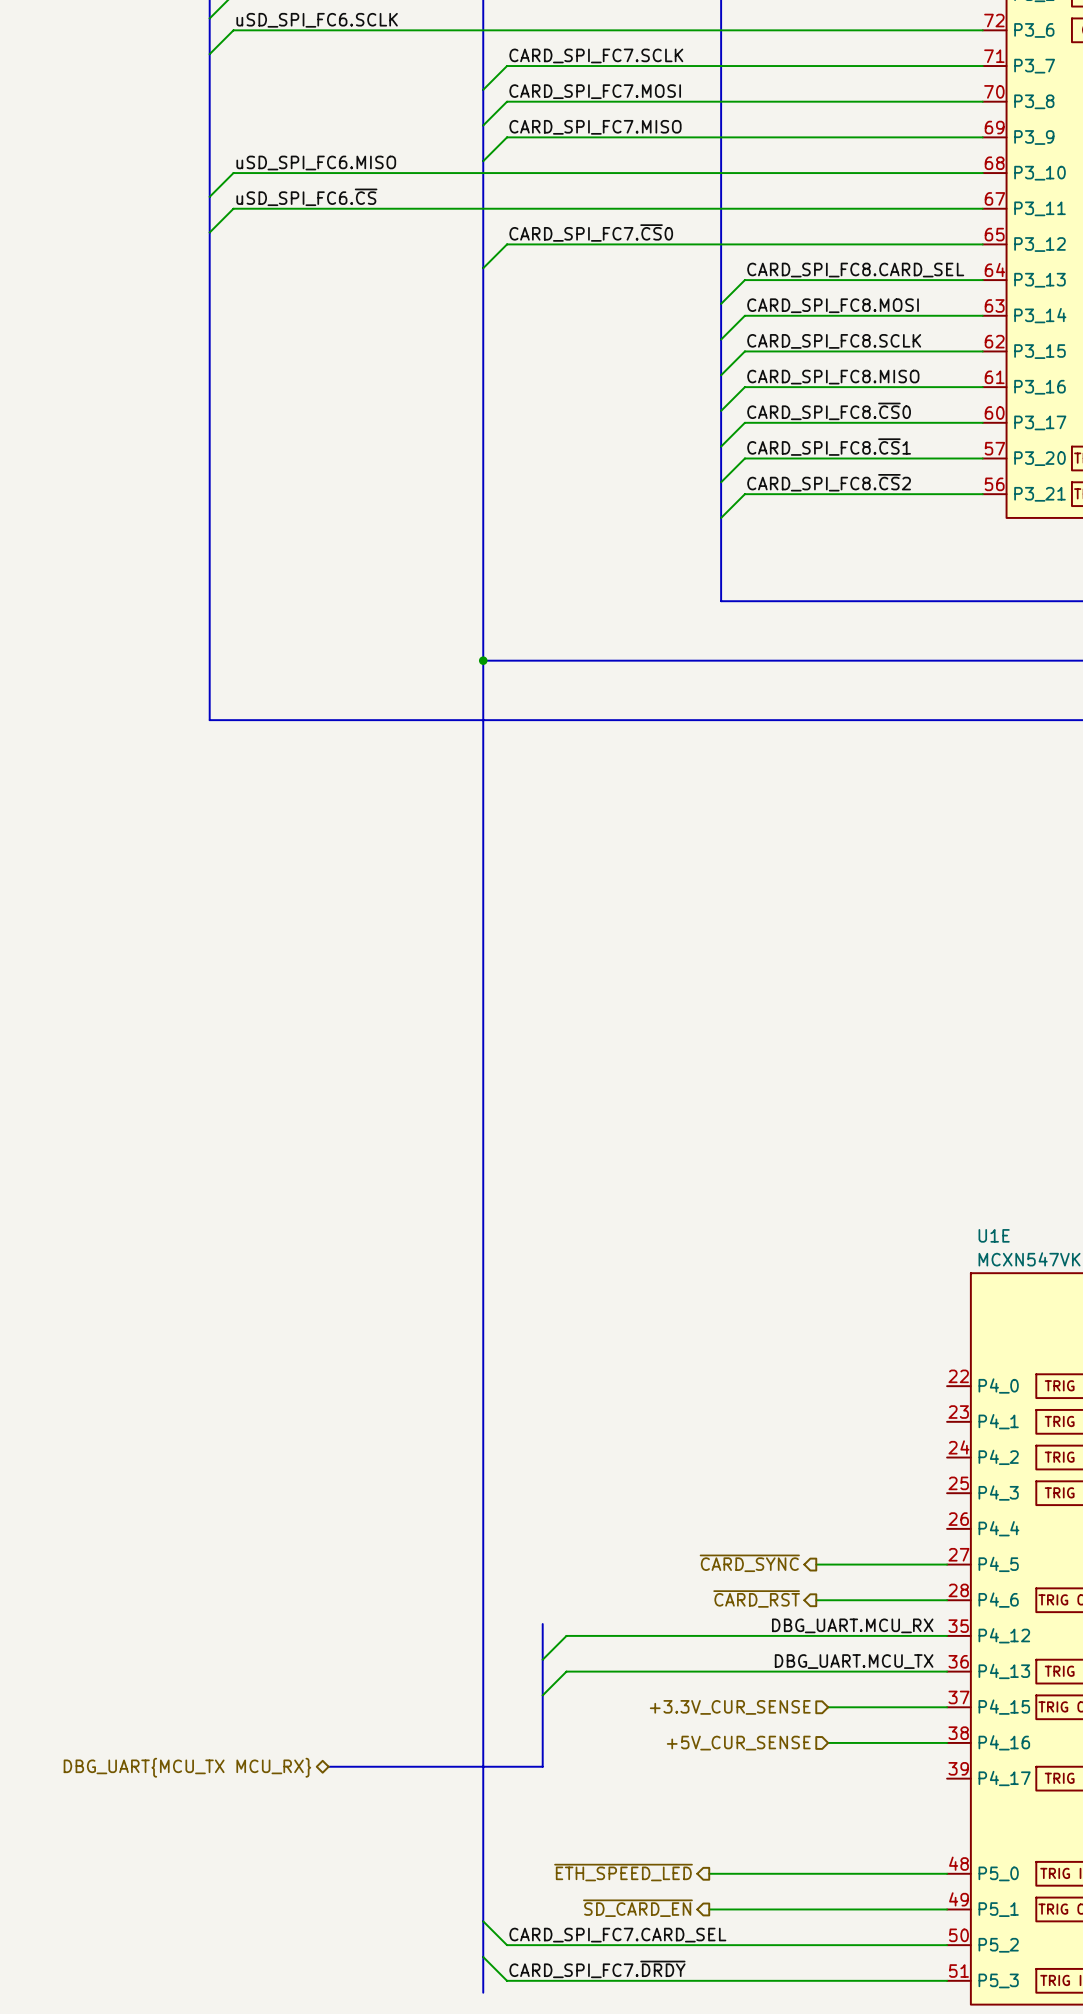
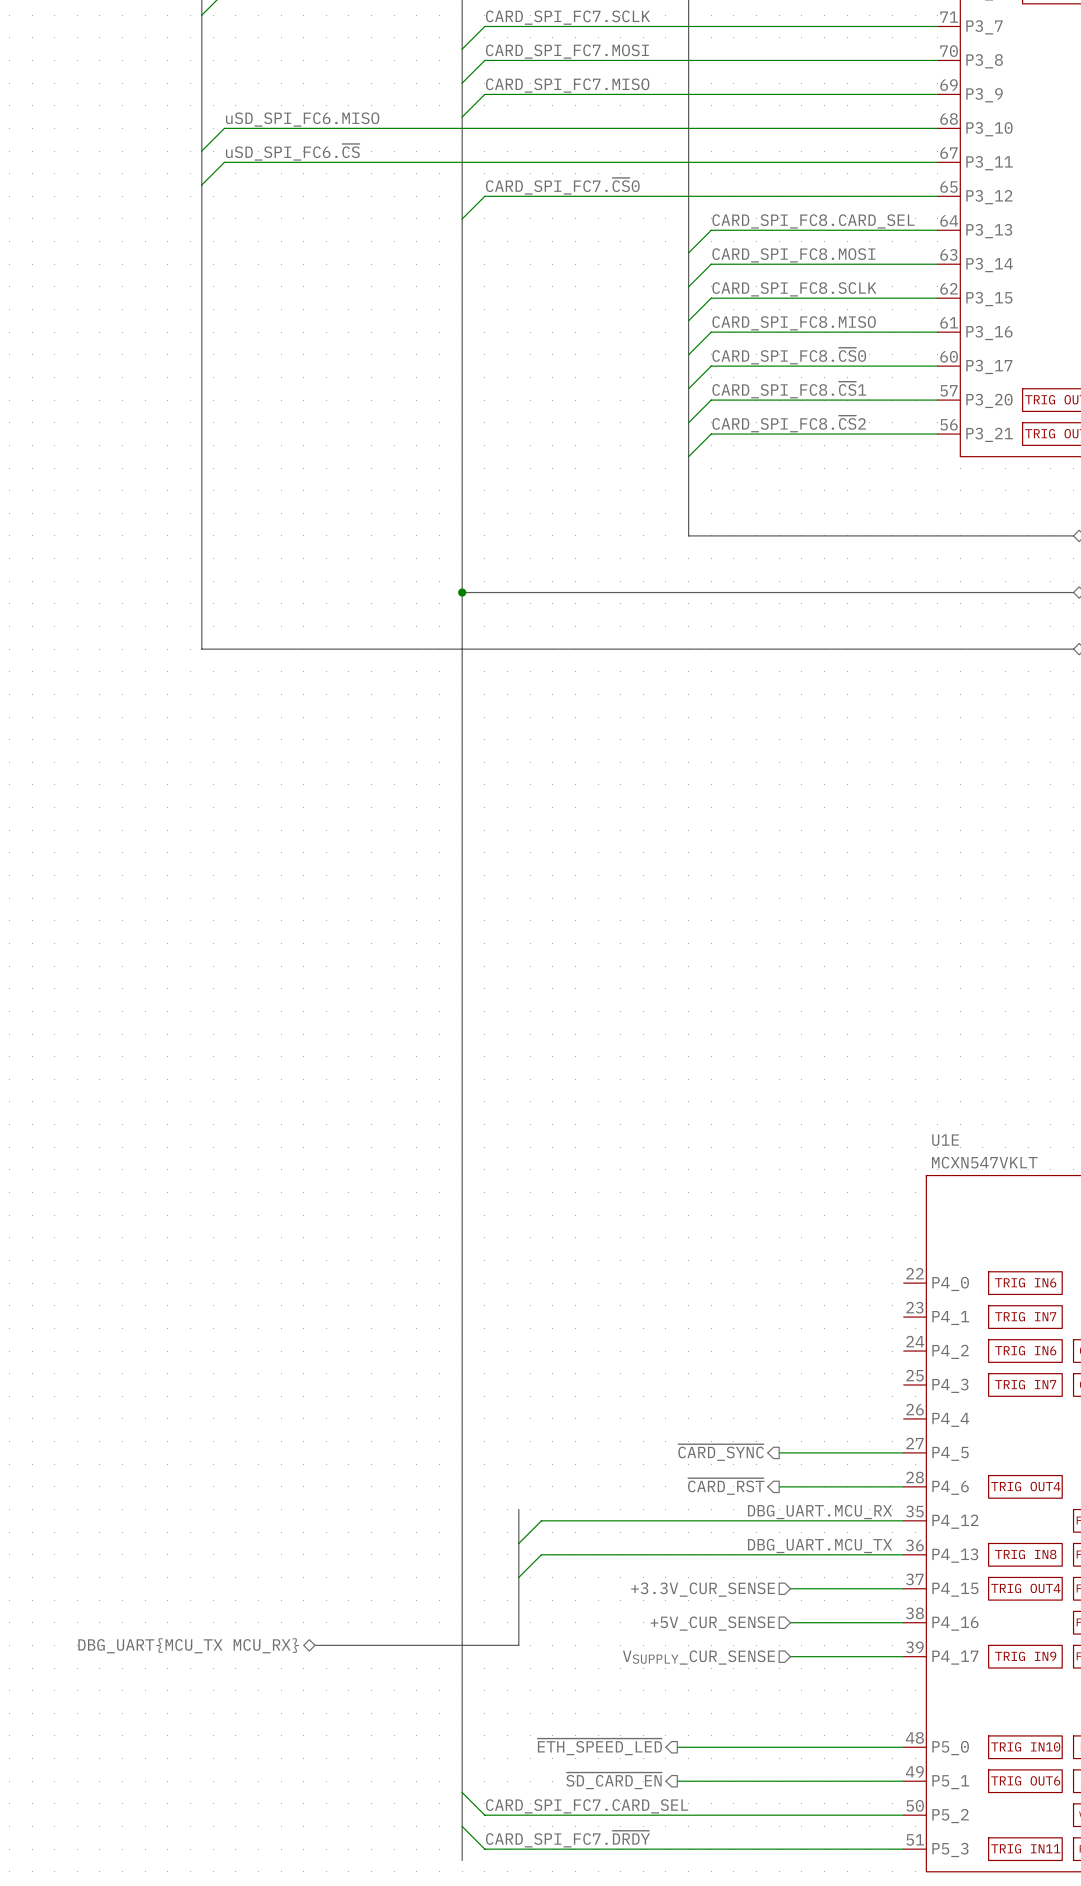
wire: none -> (790, 1656) (903, 1656)
hierarchical label: none -> VSUPPLY_CUR_SENSE (698, 1657)

